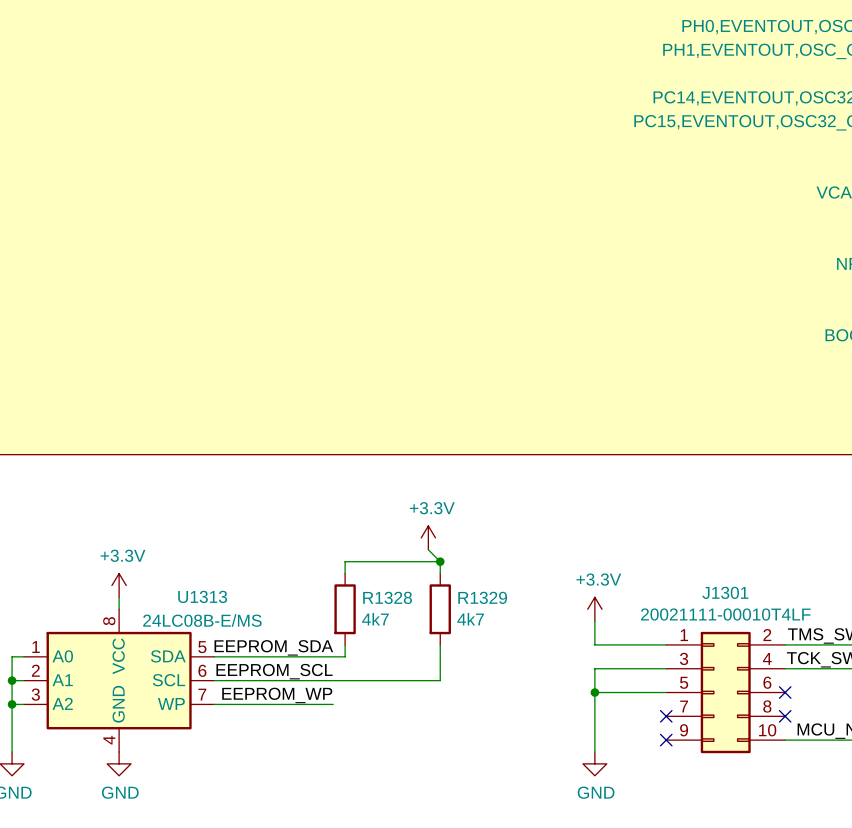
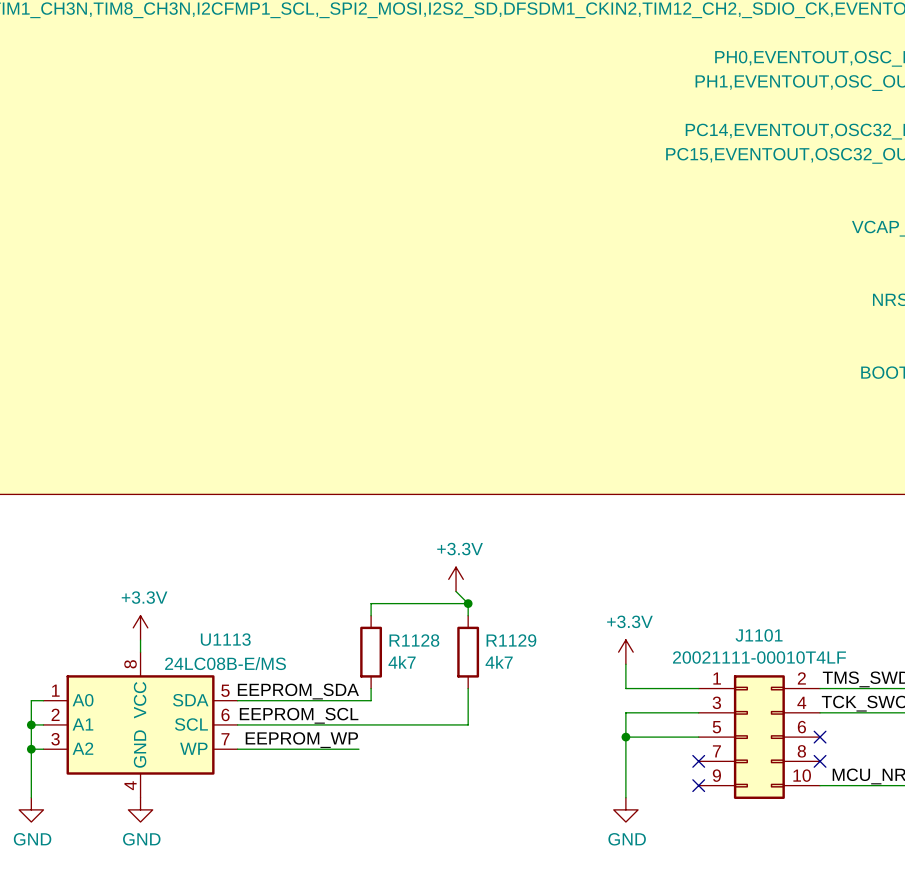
J1301 name: J1301 (725, 592) -> J1101 (759, 635)
U1313 name: U1313 (202, 596) -> U1113 (225, 639)
R1328 name: R1328 (387, 597) -> R1128 (414, 640)
R1329 name: R1329 (482, 597) -> R1129 (511, 640)

